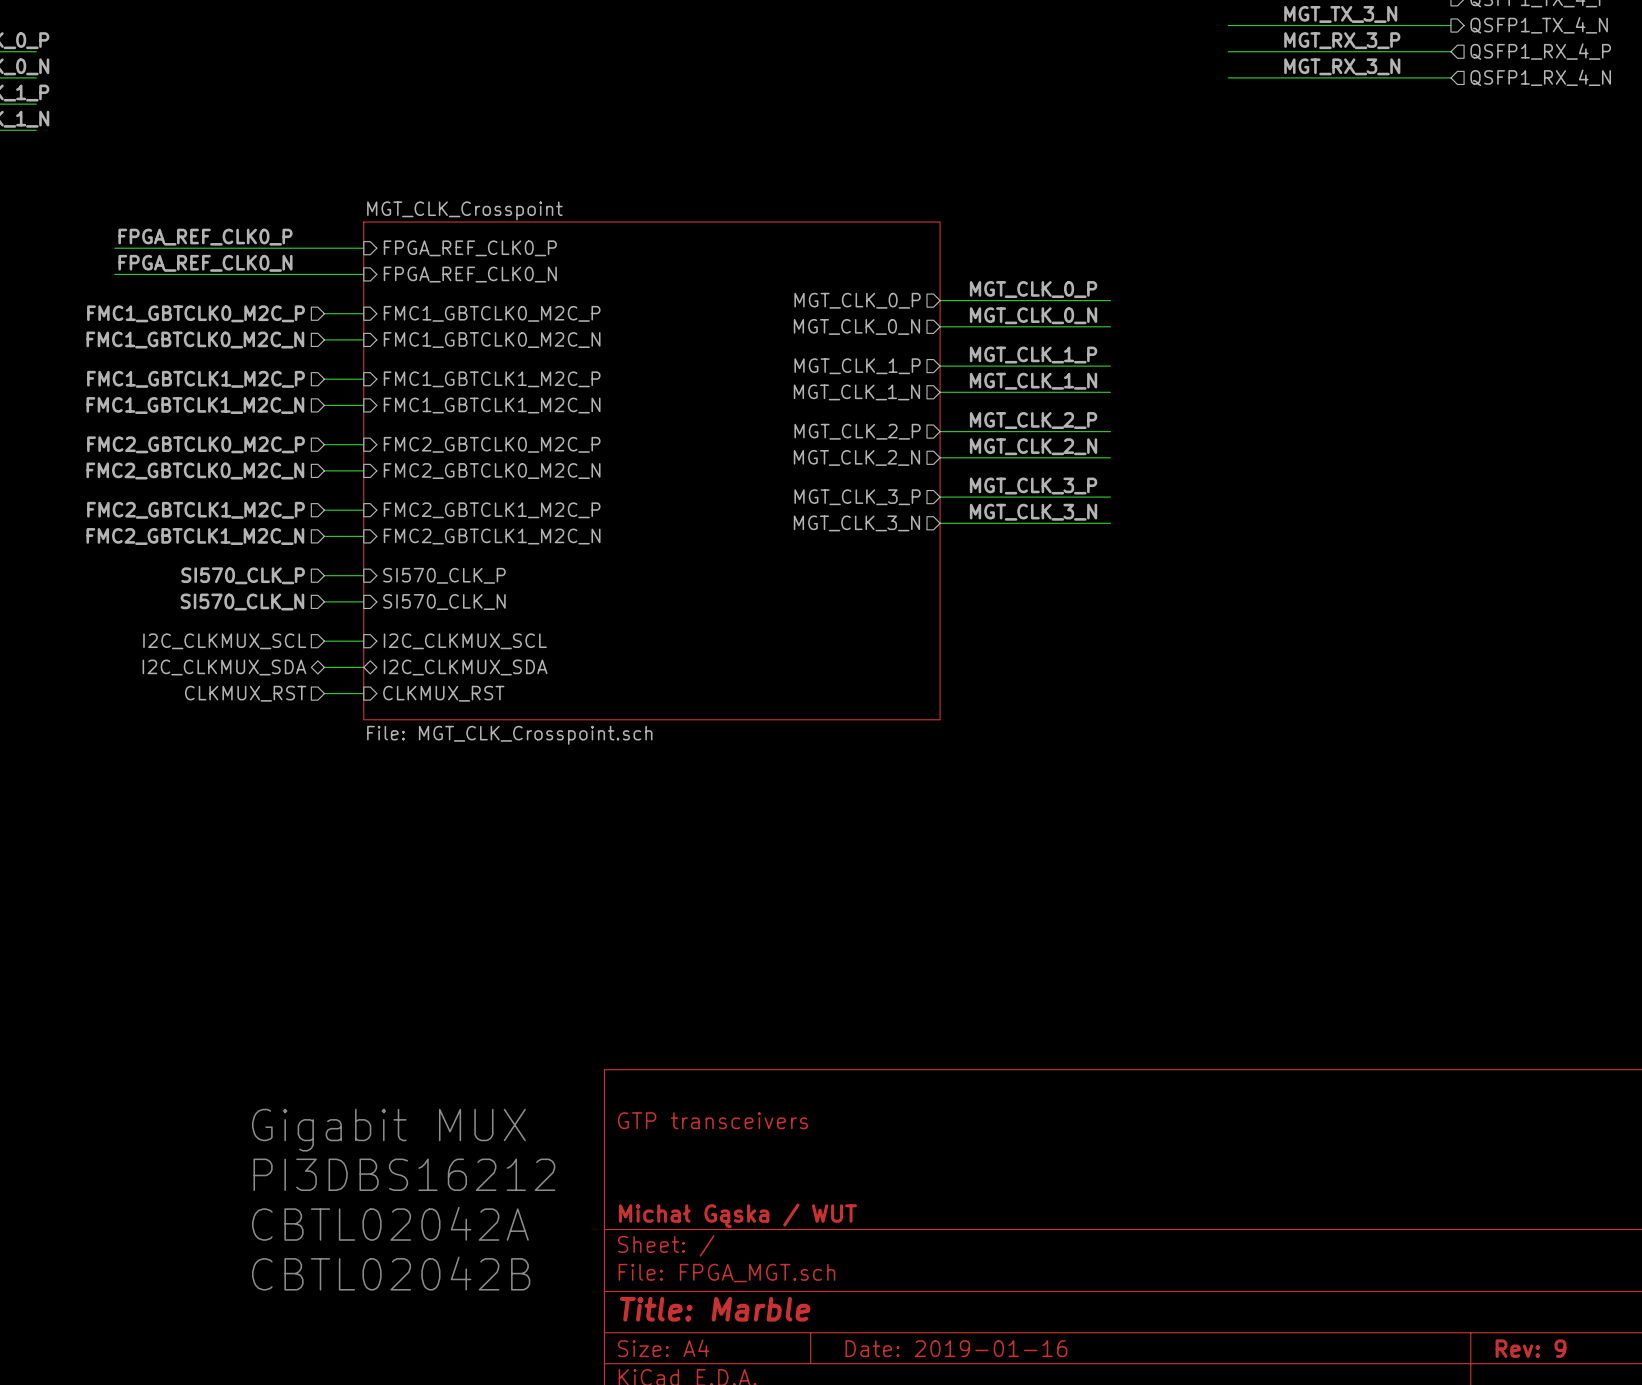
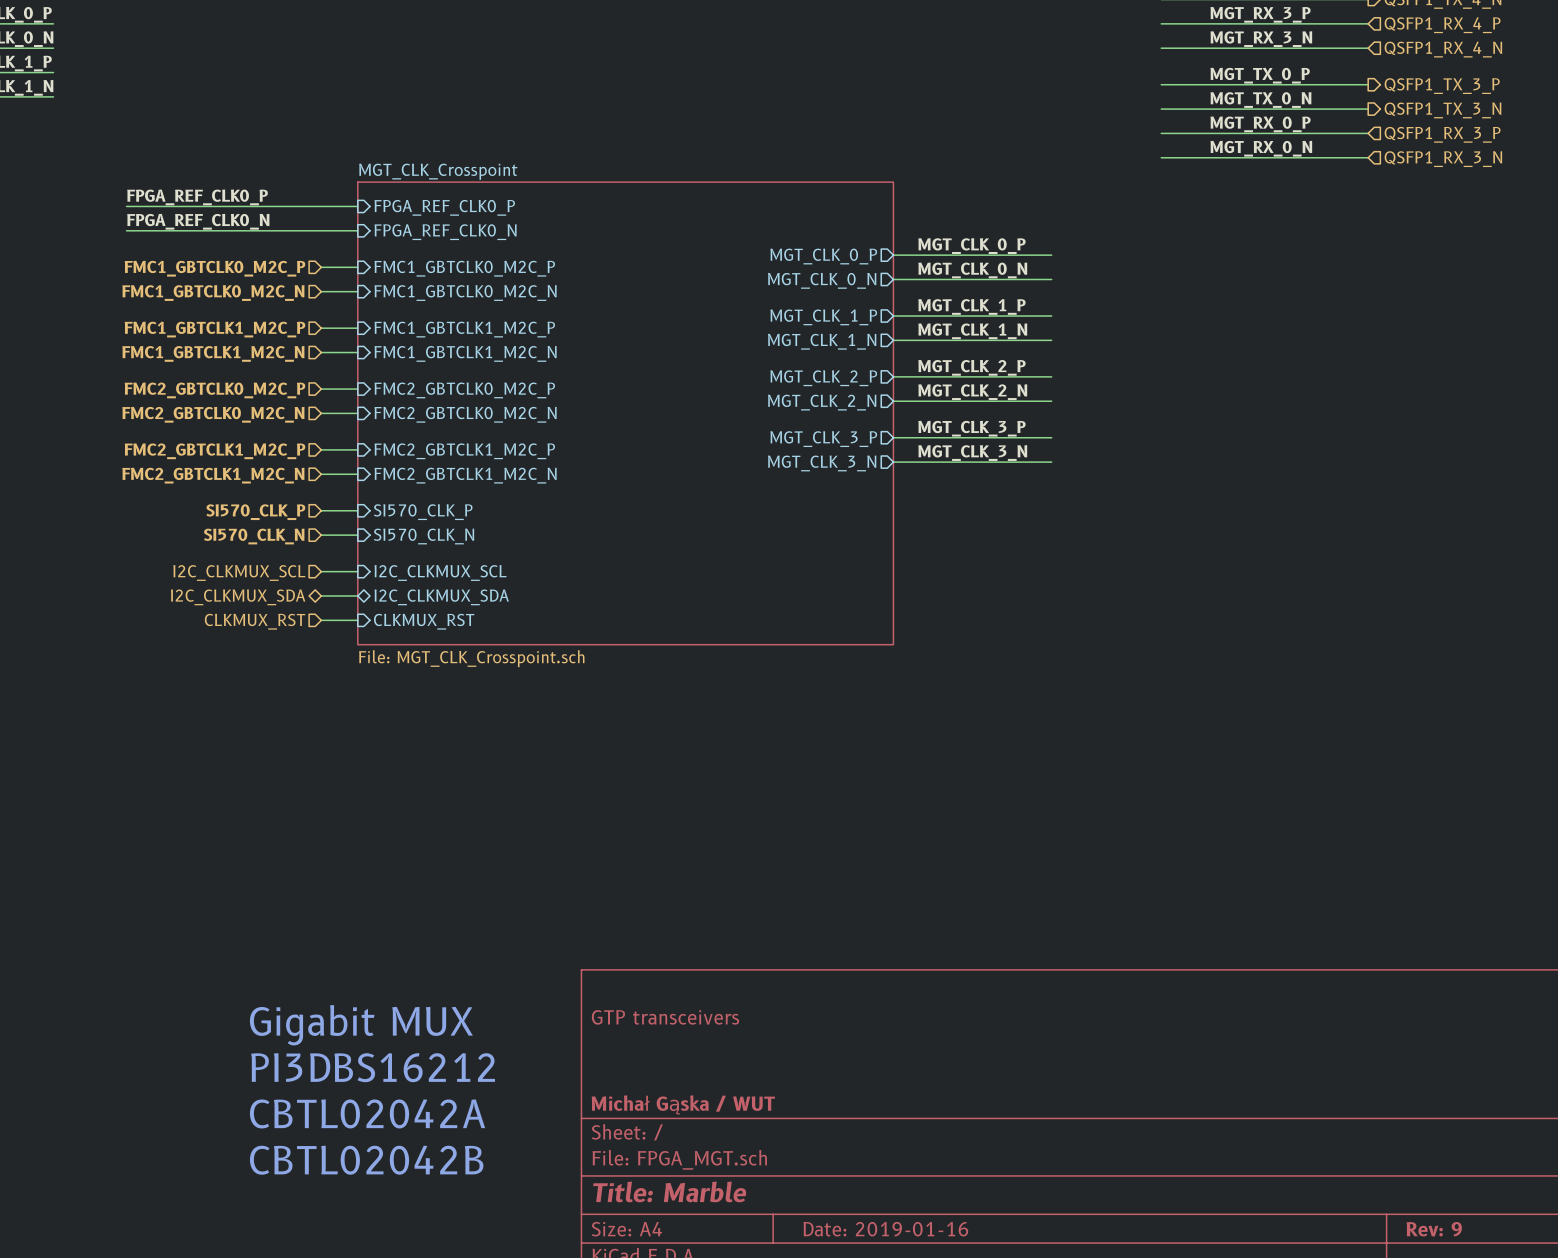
label: none -> MGT_TX_0_P (1260, 75)
wire: none -> (1161, 84) (1368, 84)
hierarchical label: none -> QSFP1_TX_3_P (1442, 86)
label: none -> MGT_TX_0_N (1260, 100)
wire: none -> (1161, 109) (1368, 109)
hierarchical label: none -> QSFP1_TX_3_N (1442, 110)
label: none -> MGT_RX_0_P (1260, 124)
wire: none -> (1161, 133) (1368, 133)
hierarchical label: none -> QSFP1_RX_3_P (1442, 134)
label: none -> MGT_RX_0_N (1261, 148)
wire: none -> (1161, 157) (1368, 157)
hierarchical label: none -> QSFP1_RX_3_N (1443, 159)

